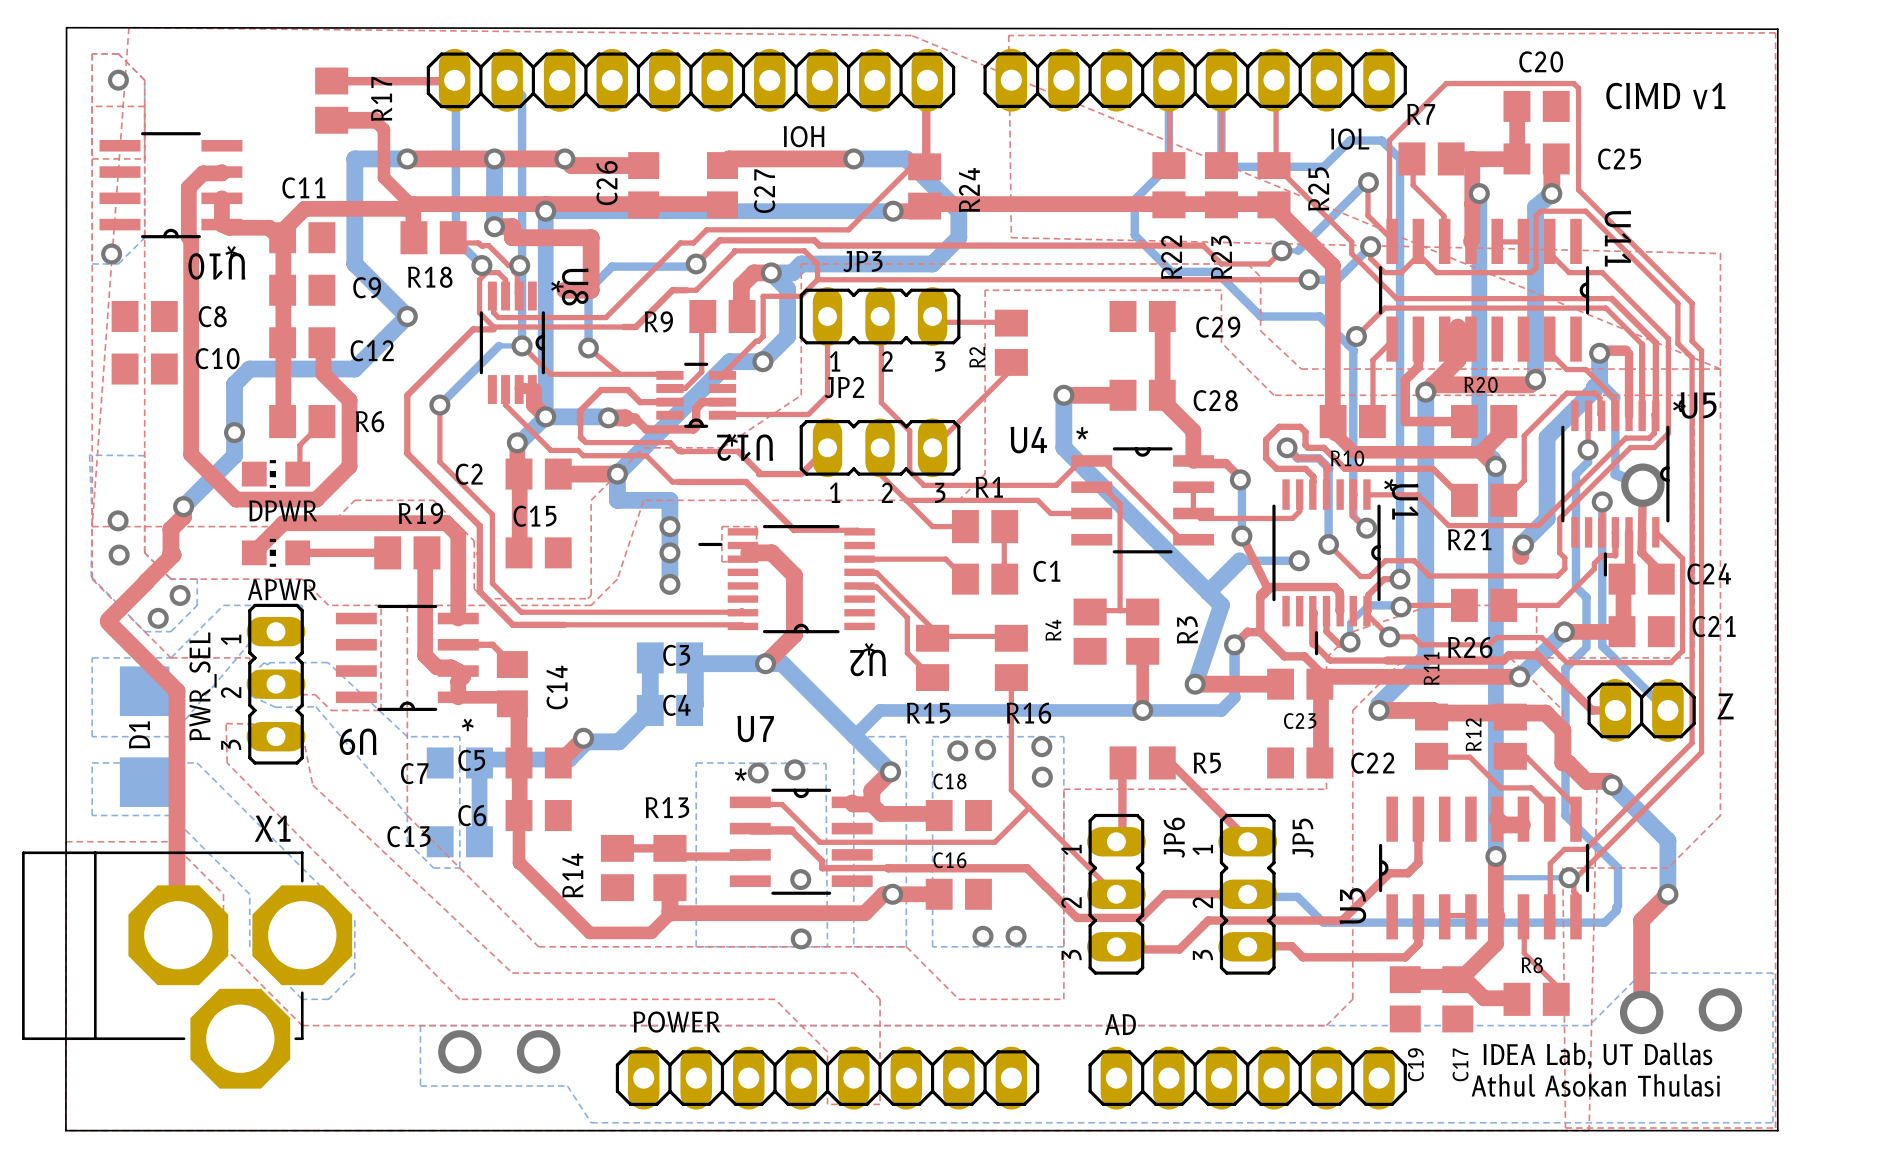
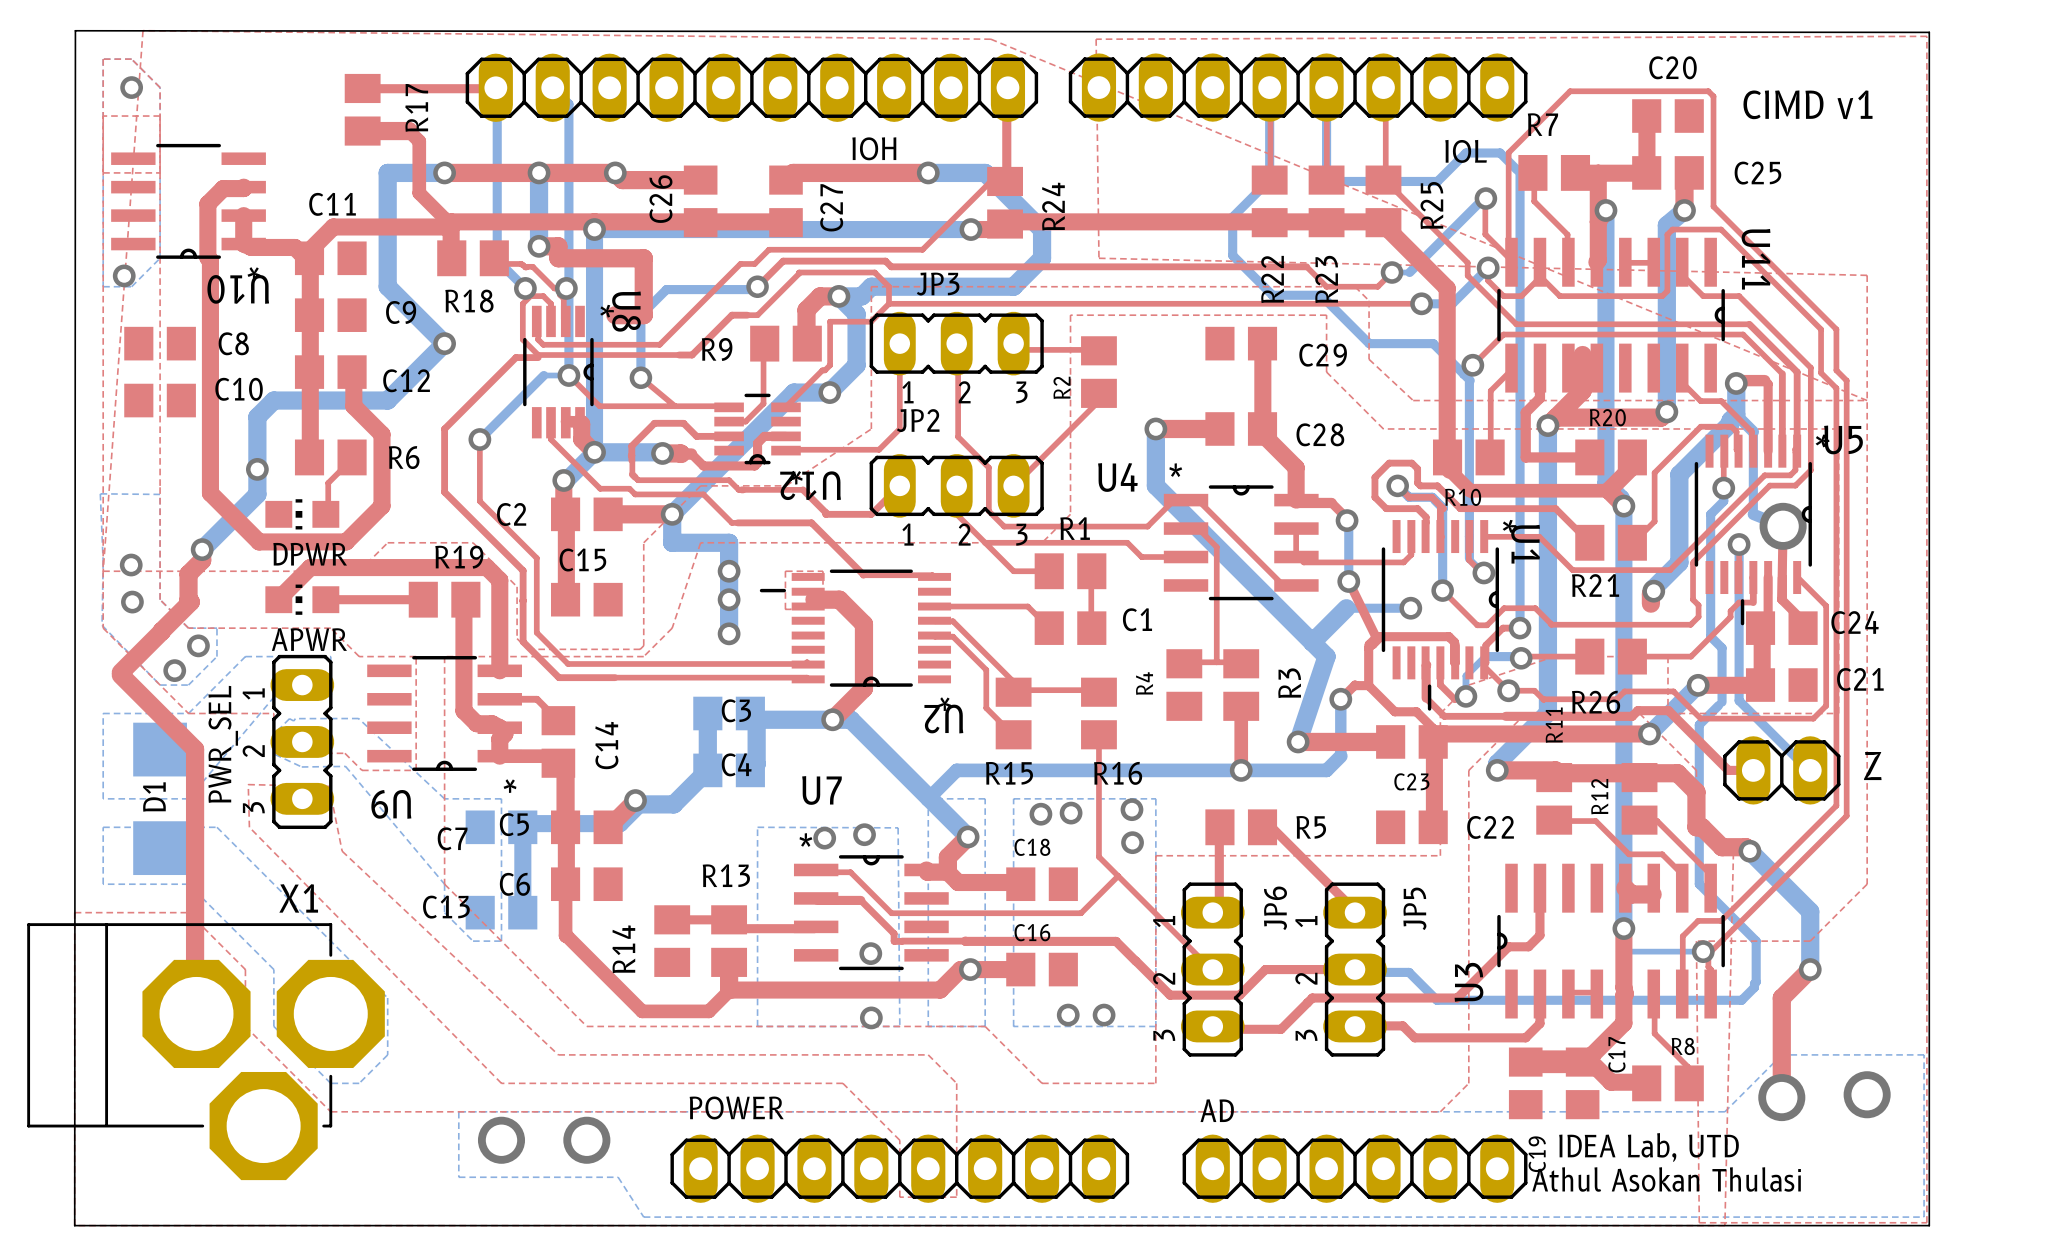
R8 name position: R8 (1532, 965) -> R8 (1683, 1046)
text: IDEA Lab, UT Dallas (1597, 1055) -> IDEA Lab, UTD (1649, 1147)
C17 name position: C17 (1460, 1064) -> C17 (1616, 1054)
text position: Athul Asokan Thulasi (1595, 1085) -> Athul Asokan Thulasi (1666, 1179)

